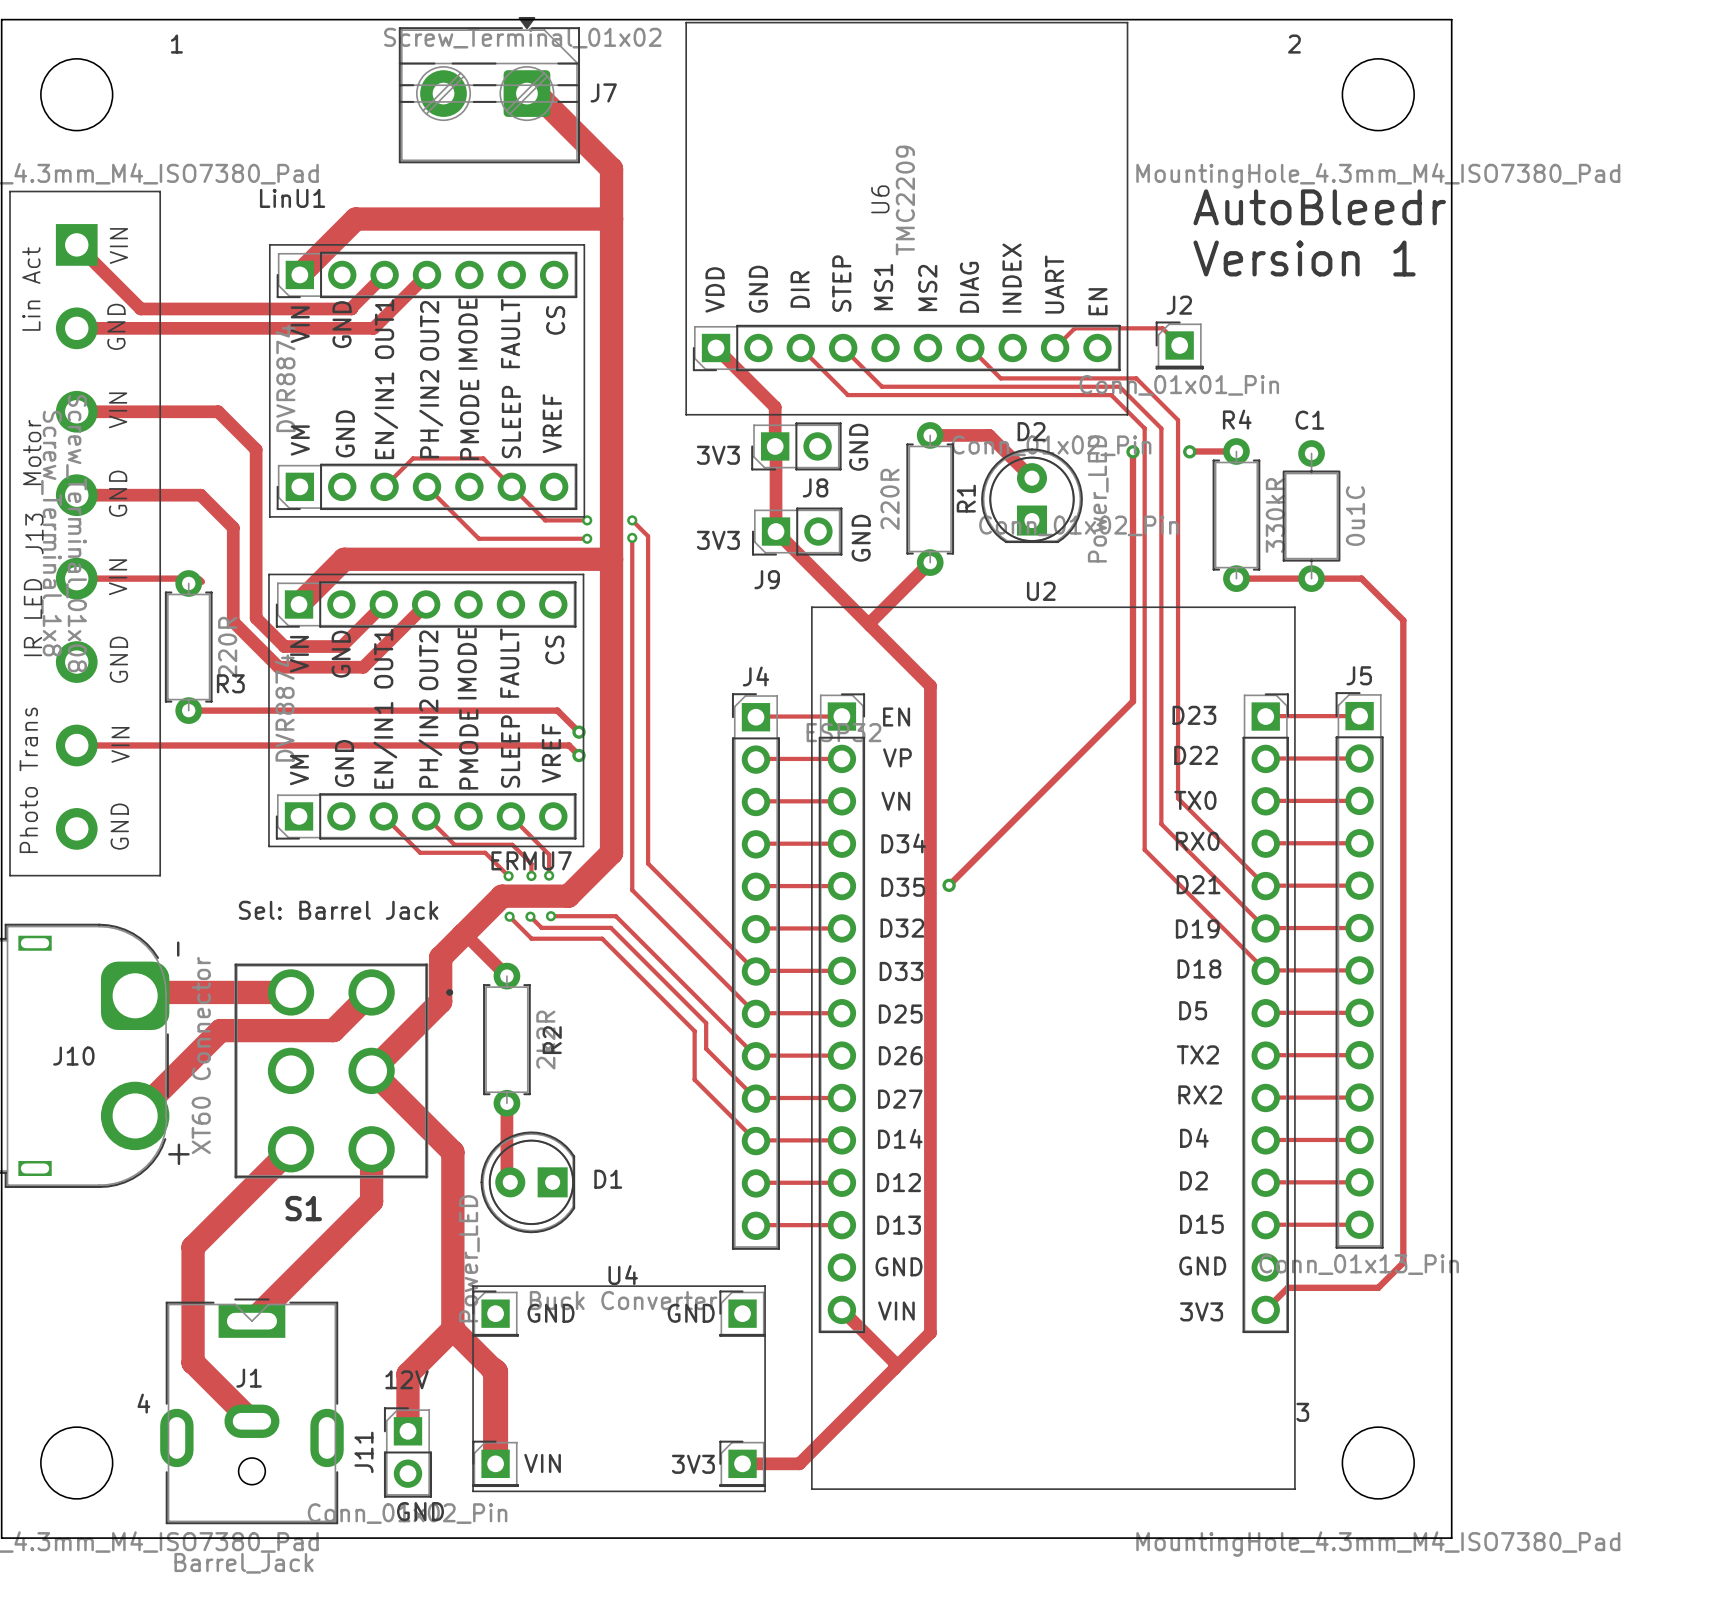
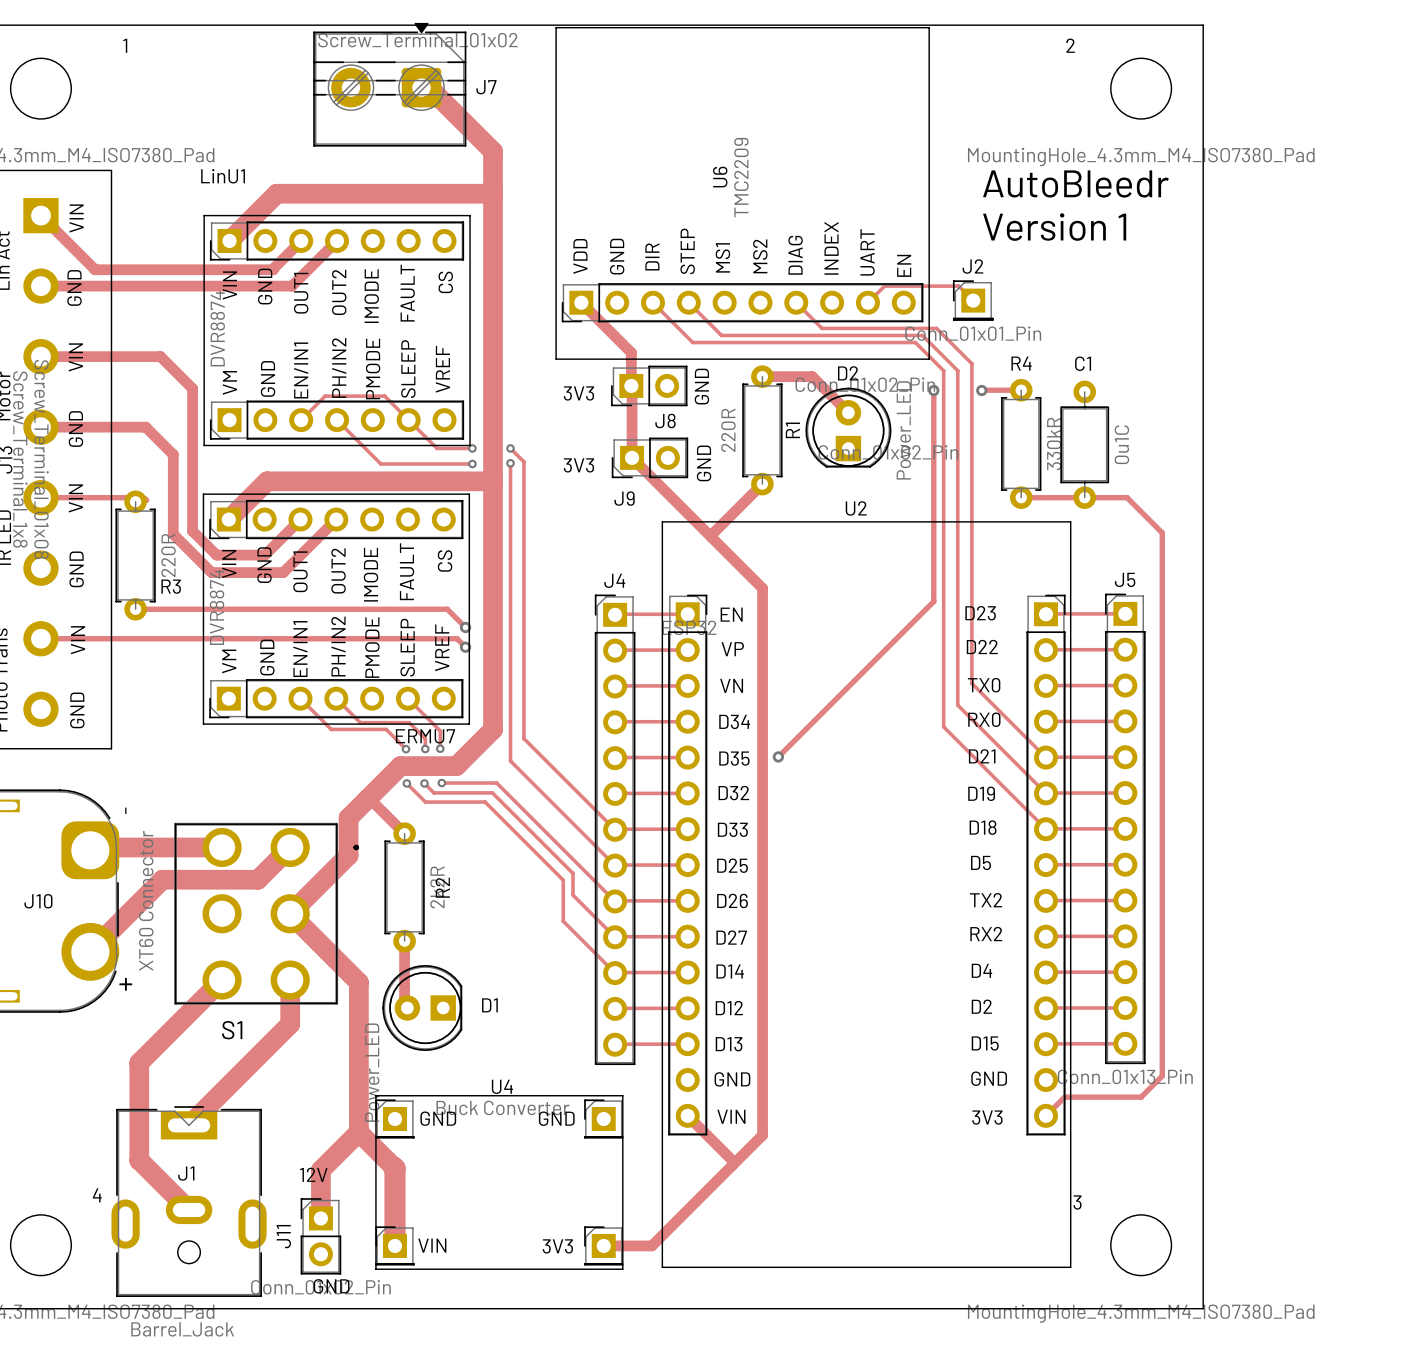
text: Sel: Barrel Jack (338, 910) -> none

